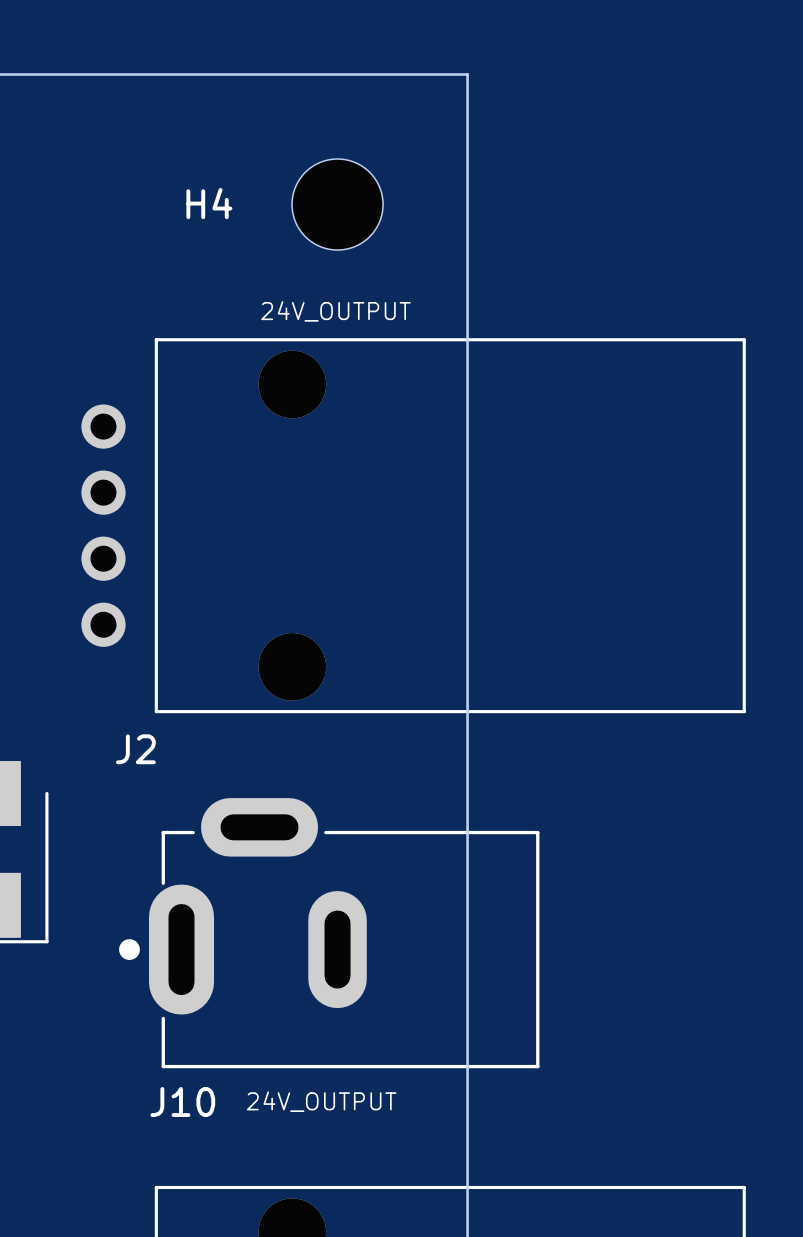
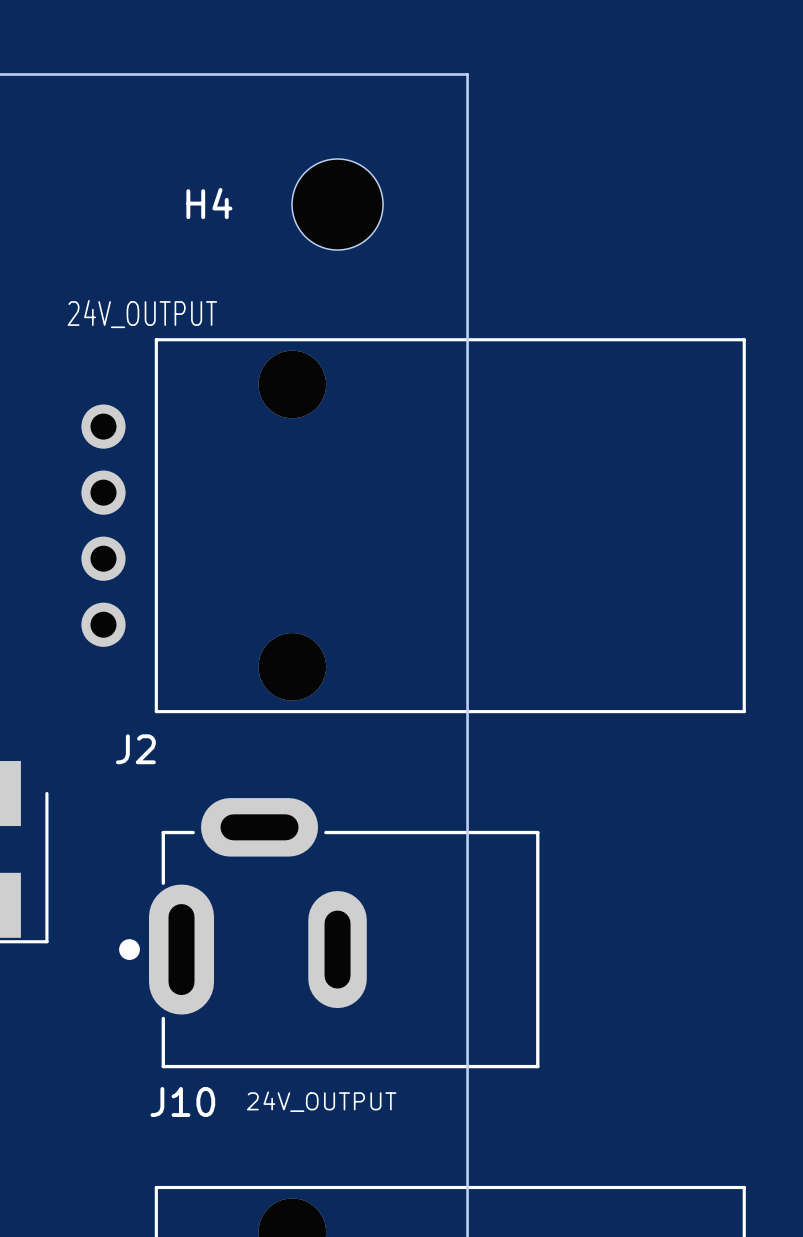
text position: 24V_OUTPUT (335, 311) -> 24V_OUTPUT (142, 314)

